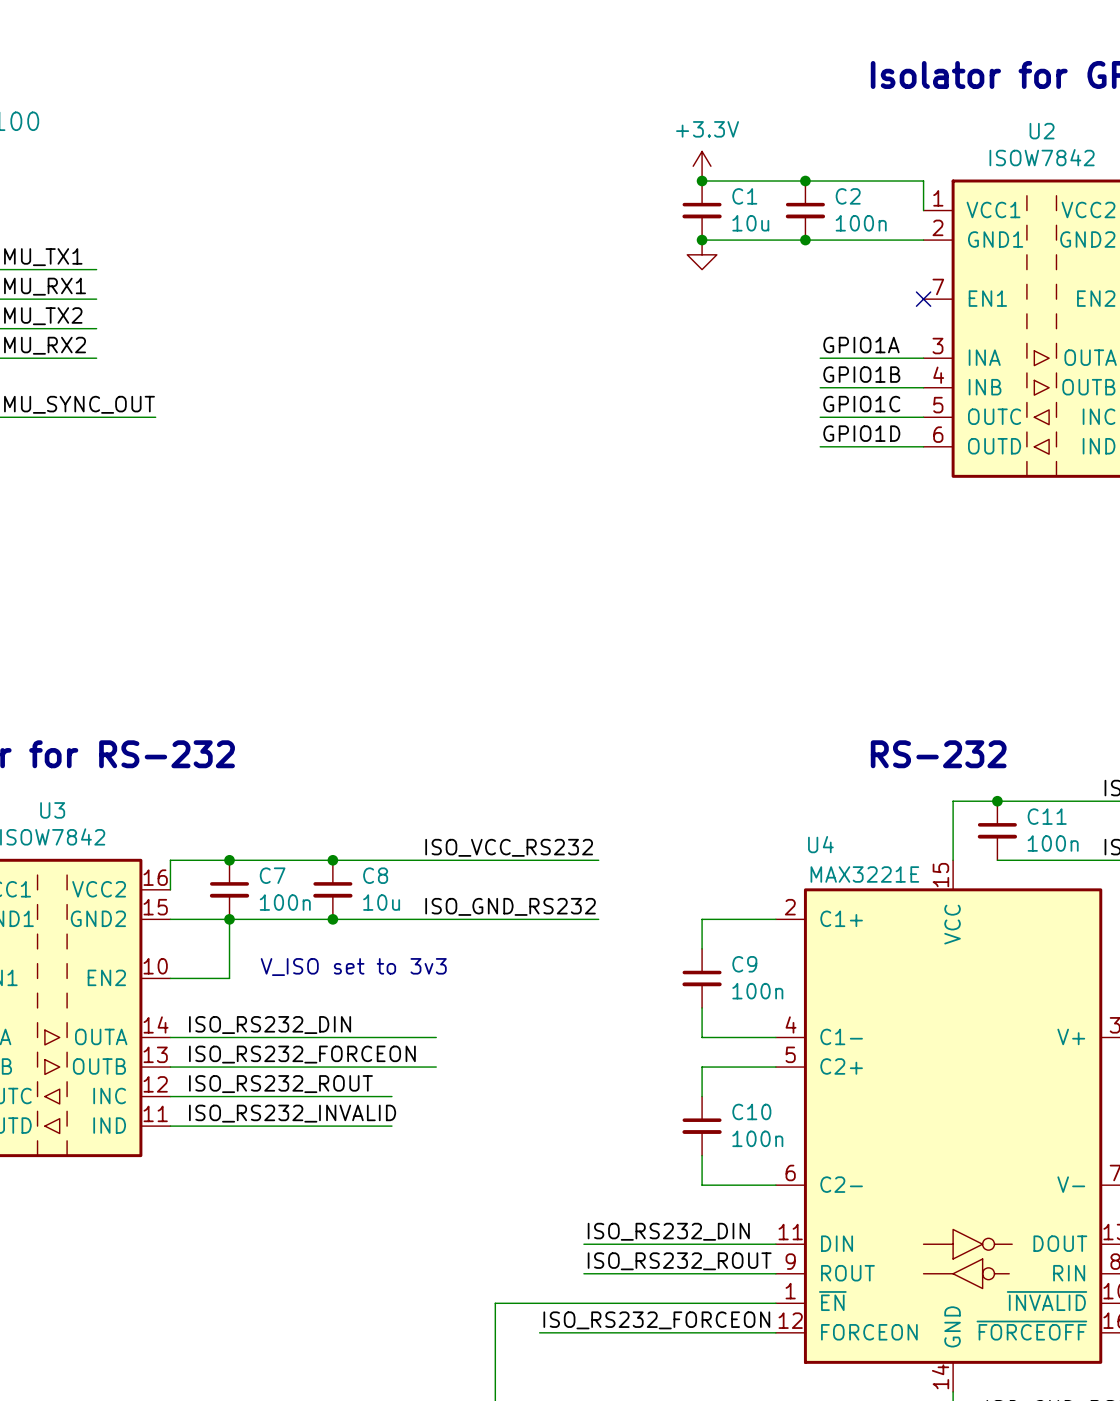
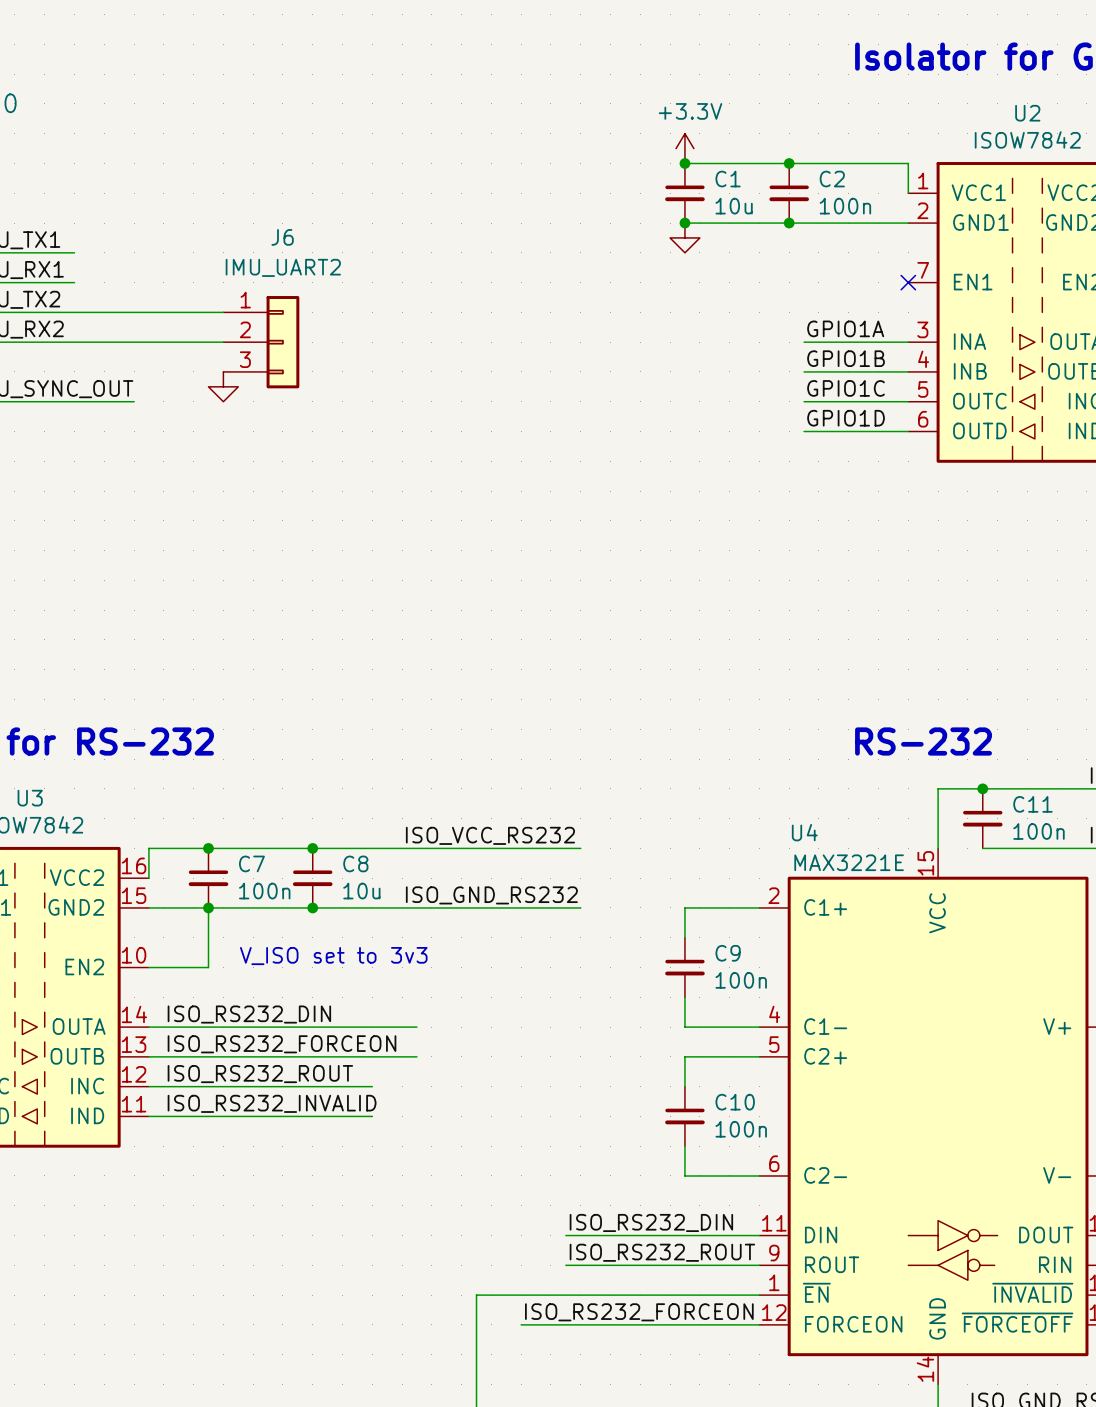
wire: none -> (74, 312) (223, 312)
wire: none -> (74, 342) (223, 342)
J6: none -> IMU_UART2 (261, 342)
power symbol: none -> (223, 386)

